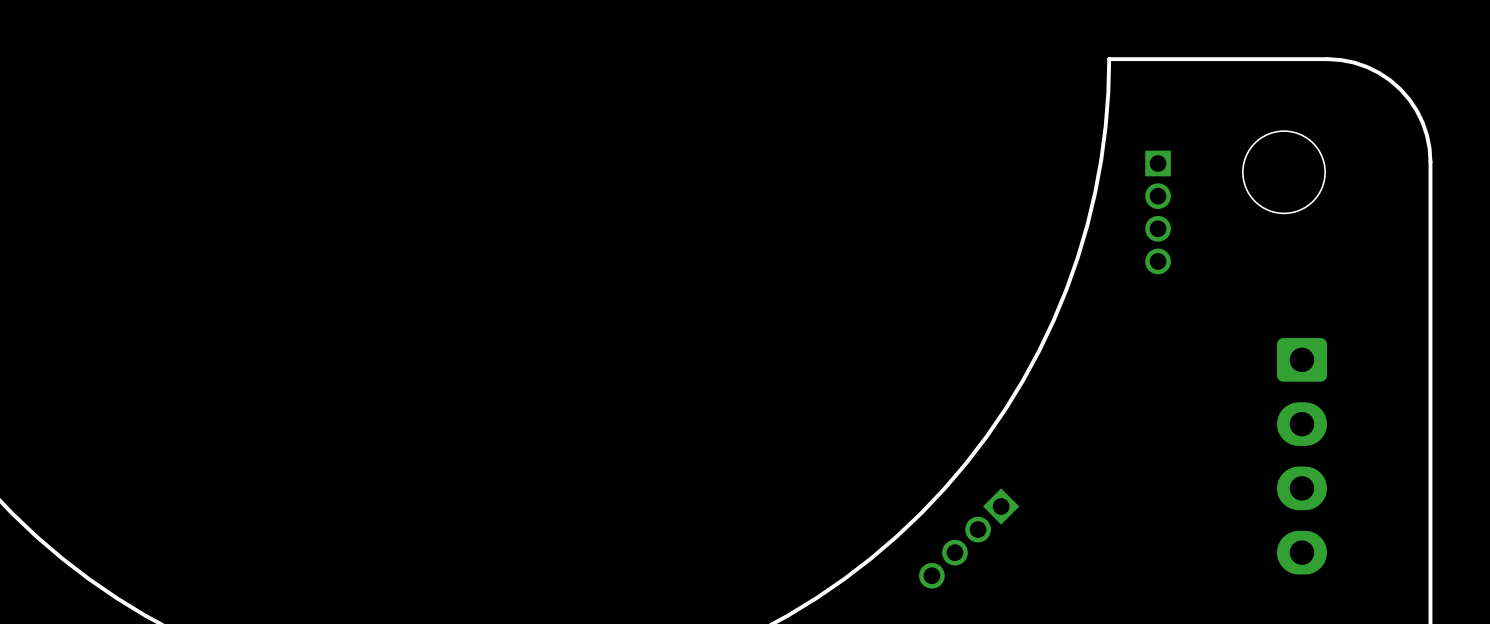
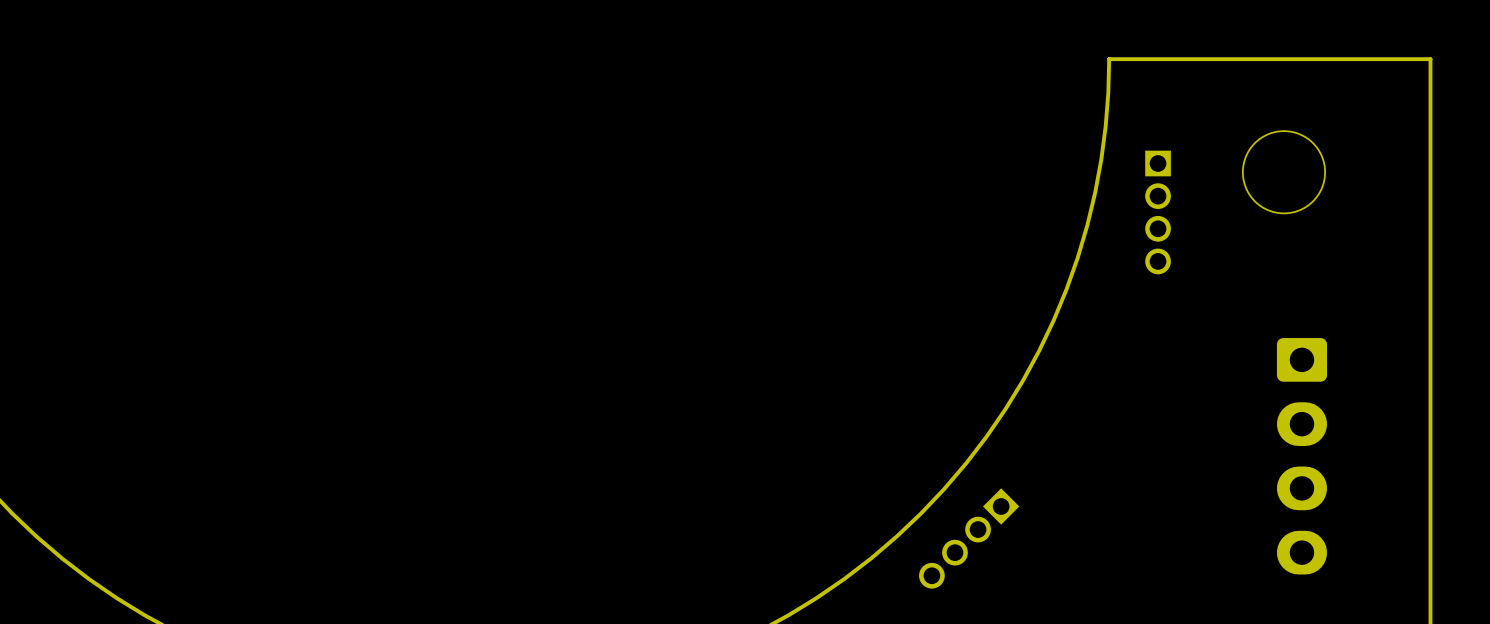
board edge: (1327, 59) (1341, 60) (1367, 66) (1379, 72) (1400, 89) (1409, 99) (1422, 122) (1429, 148) (1430, 161) -> (1327, 59) (1430, 59) (1430, 161)

